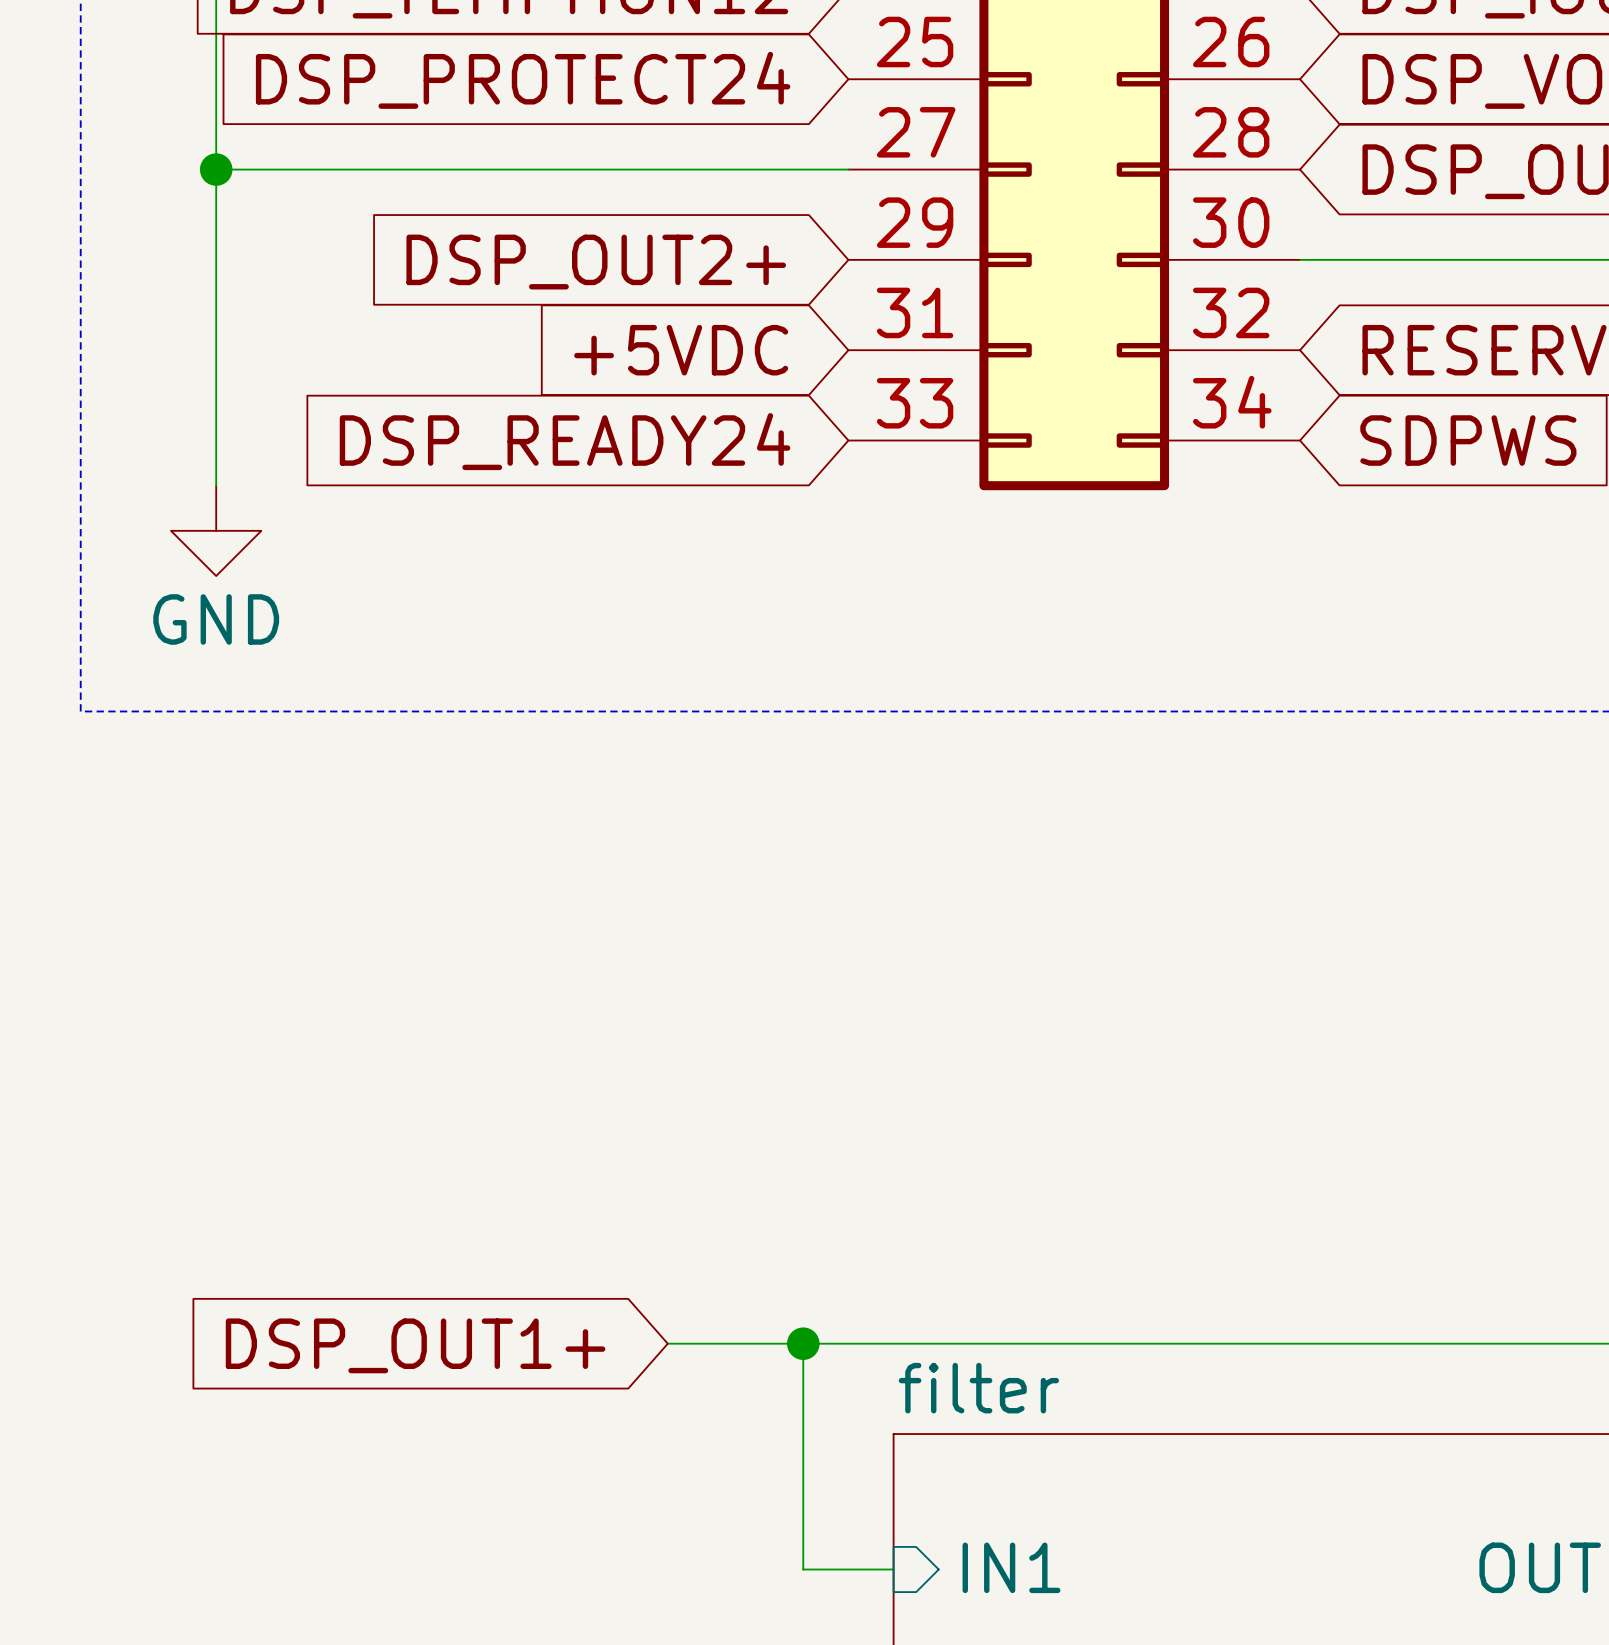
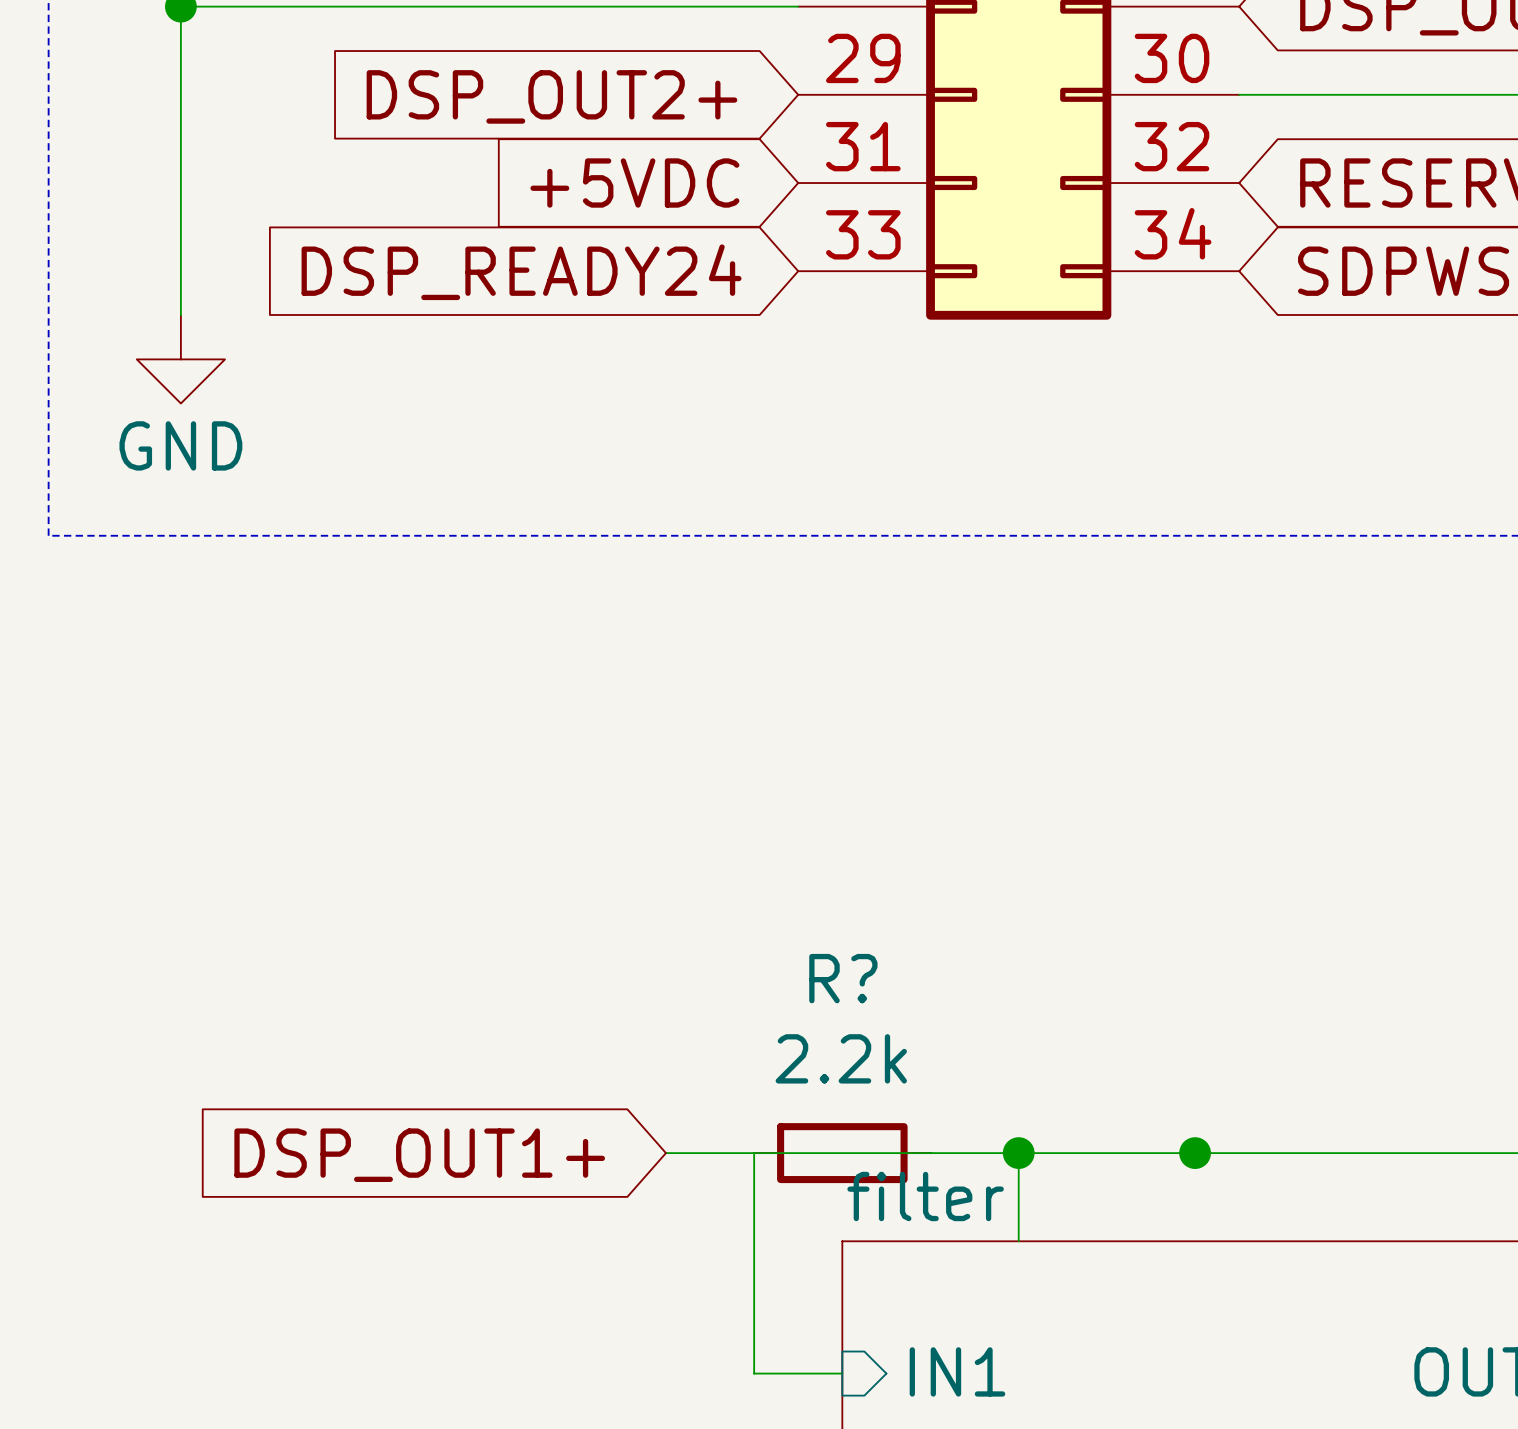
wire: (667, 1343) (712, 1343) -> none
junction: (803, 1343) -> none
R?: none -> 2.2k (842, 1153)
wire: none -> (1018, 1153) (1018, 1241)
junction: none -> (1018, 1153)
junction: none -> (1195, 1153)
global label position: DSP_OUT1+ (415, 1345) -> DSP_OUT1+ (419, 1155)

